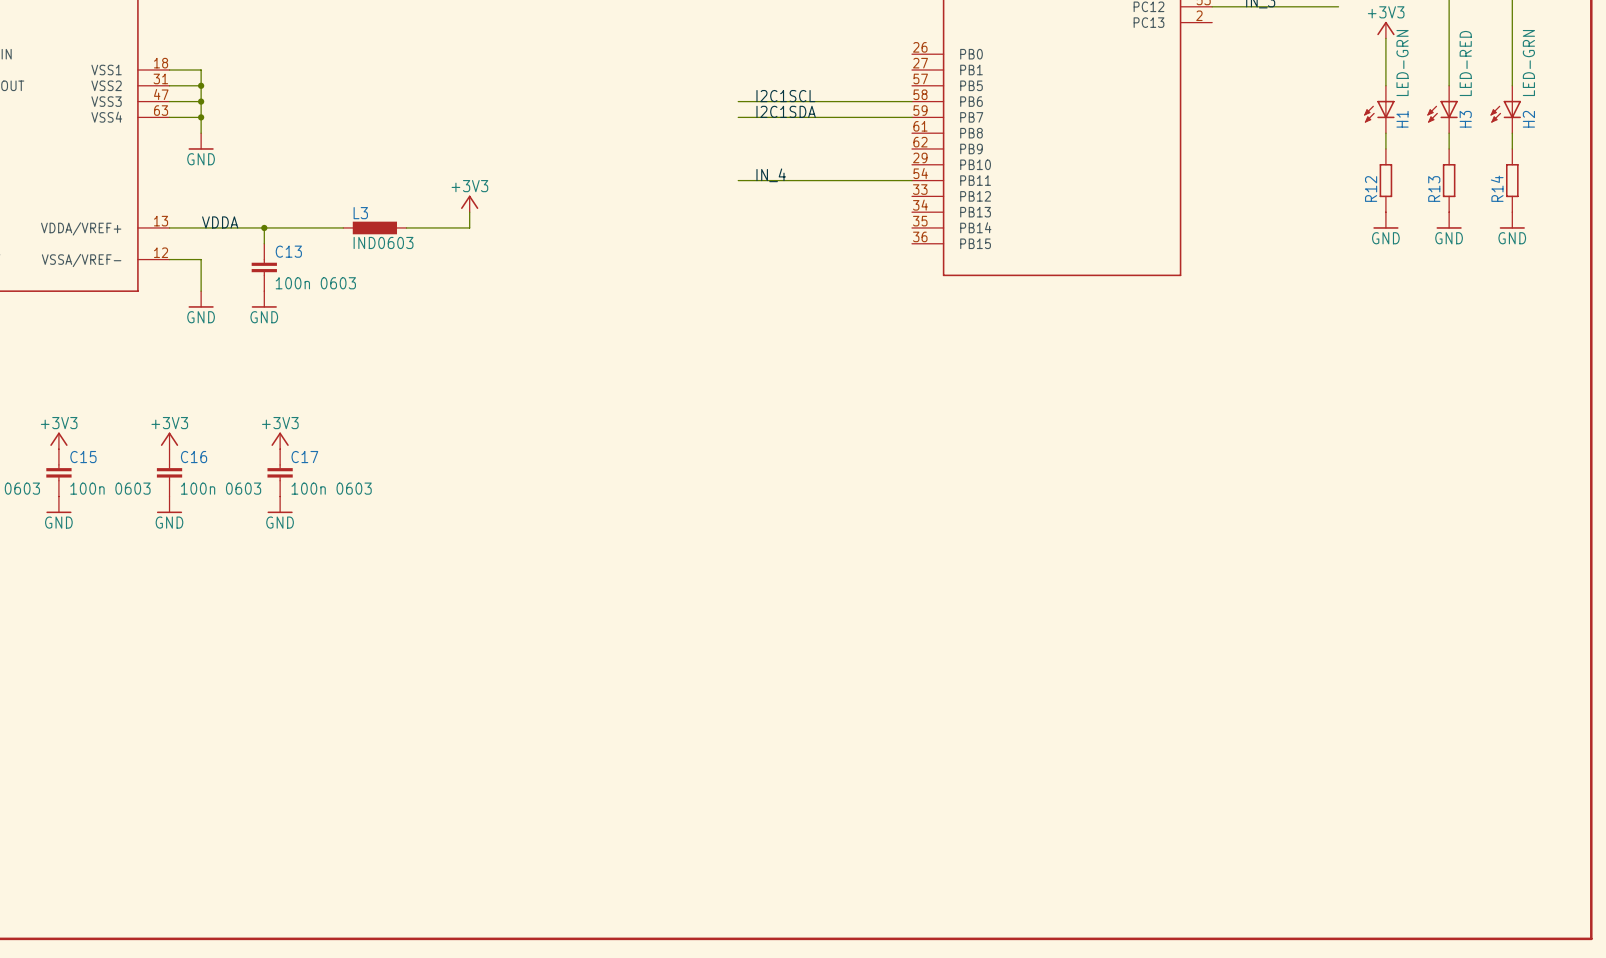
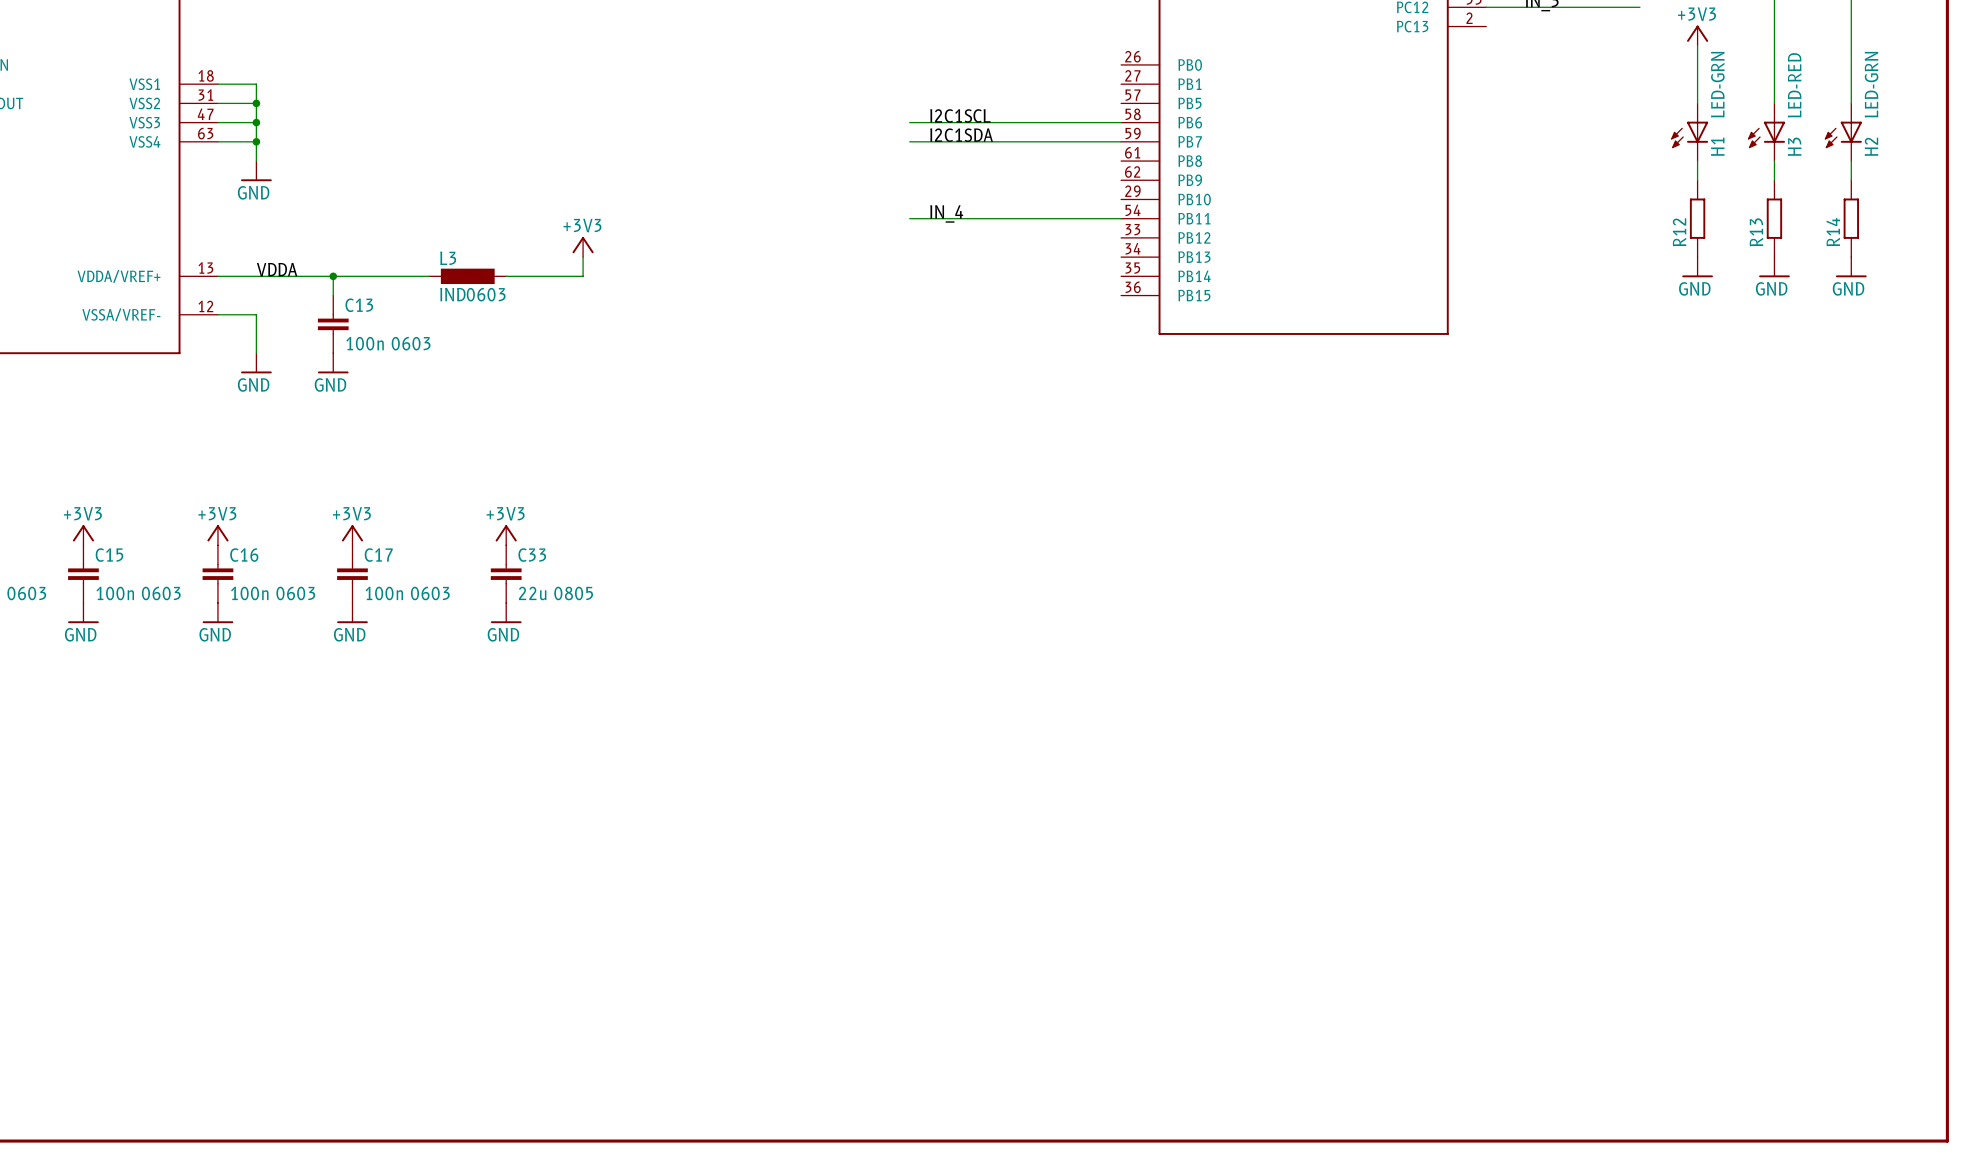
power symbol: none -> +3V3 (506, 535)
C33: none -> 22u 0805 (506, 574)
power symbol: none -> GND (506, 613)

